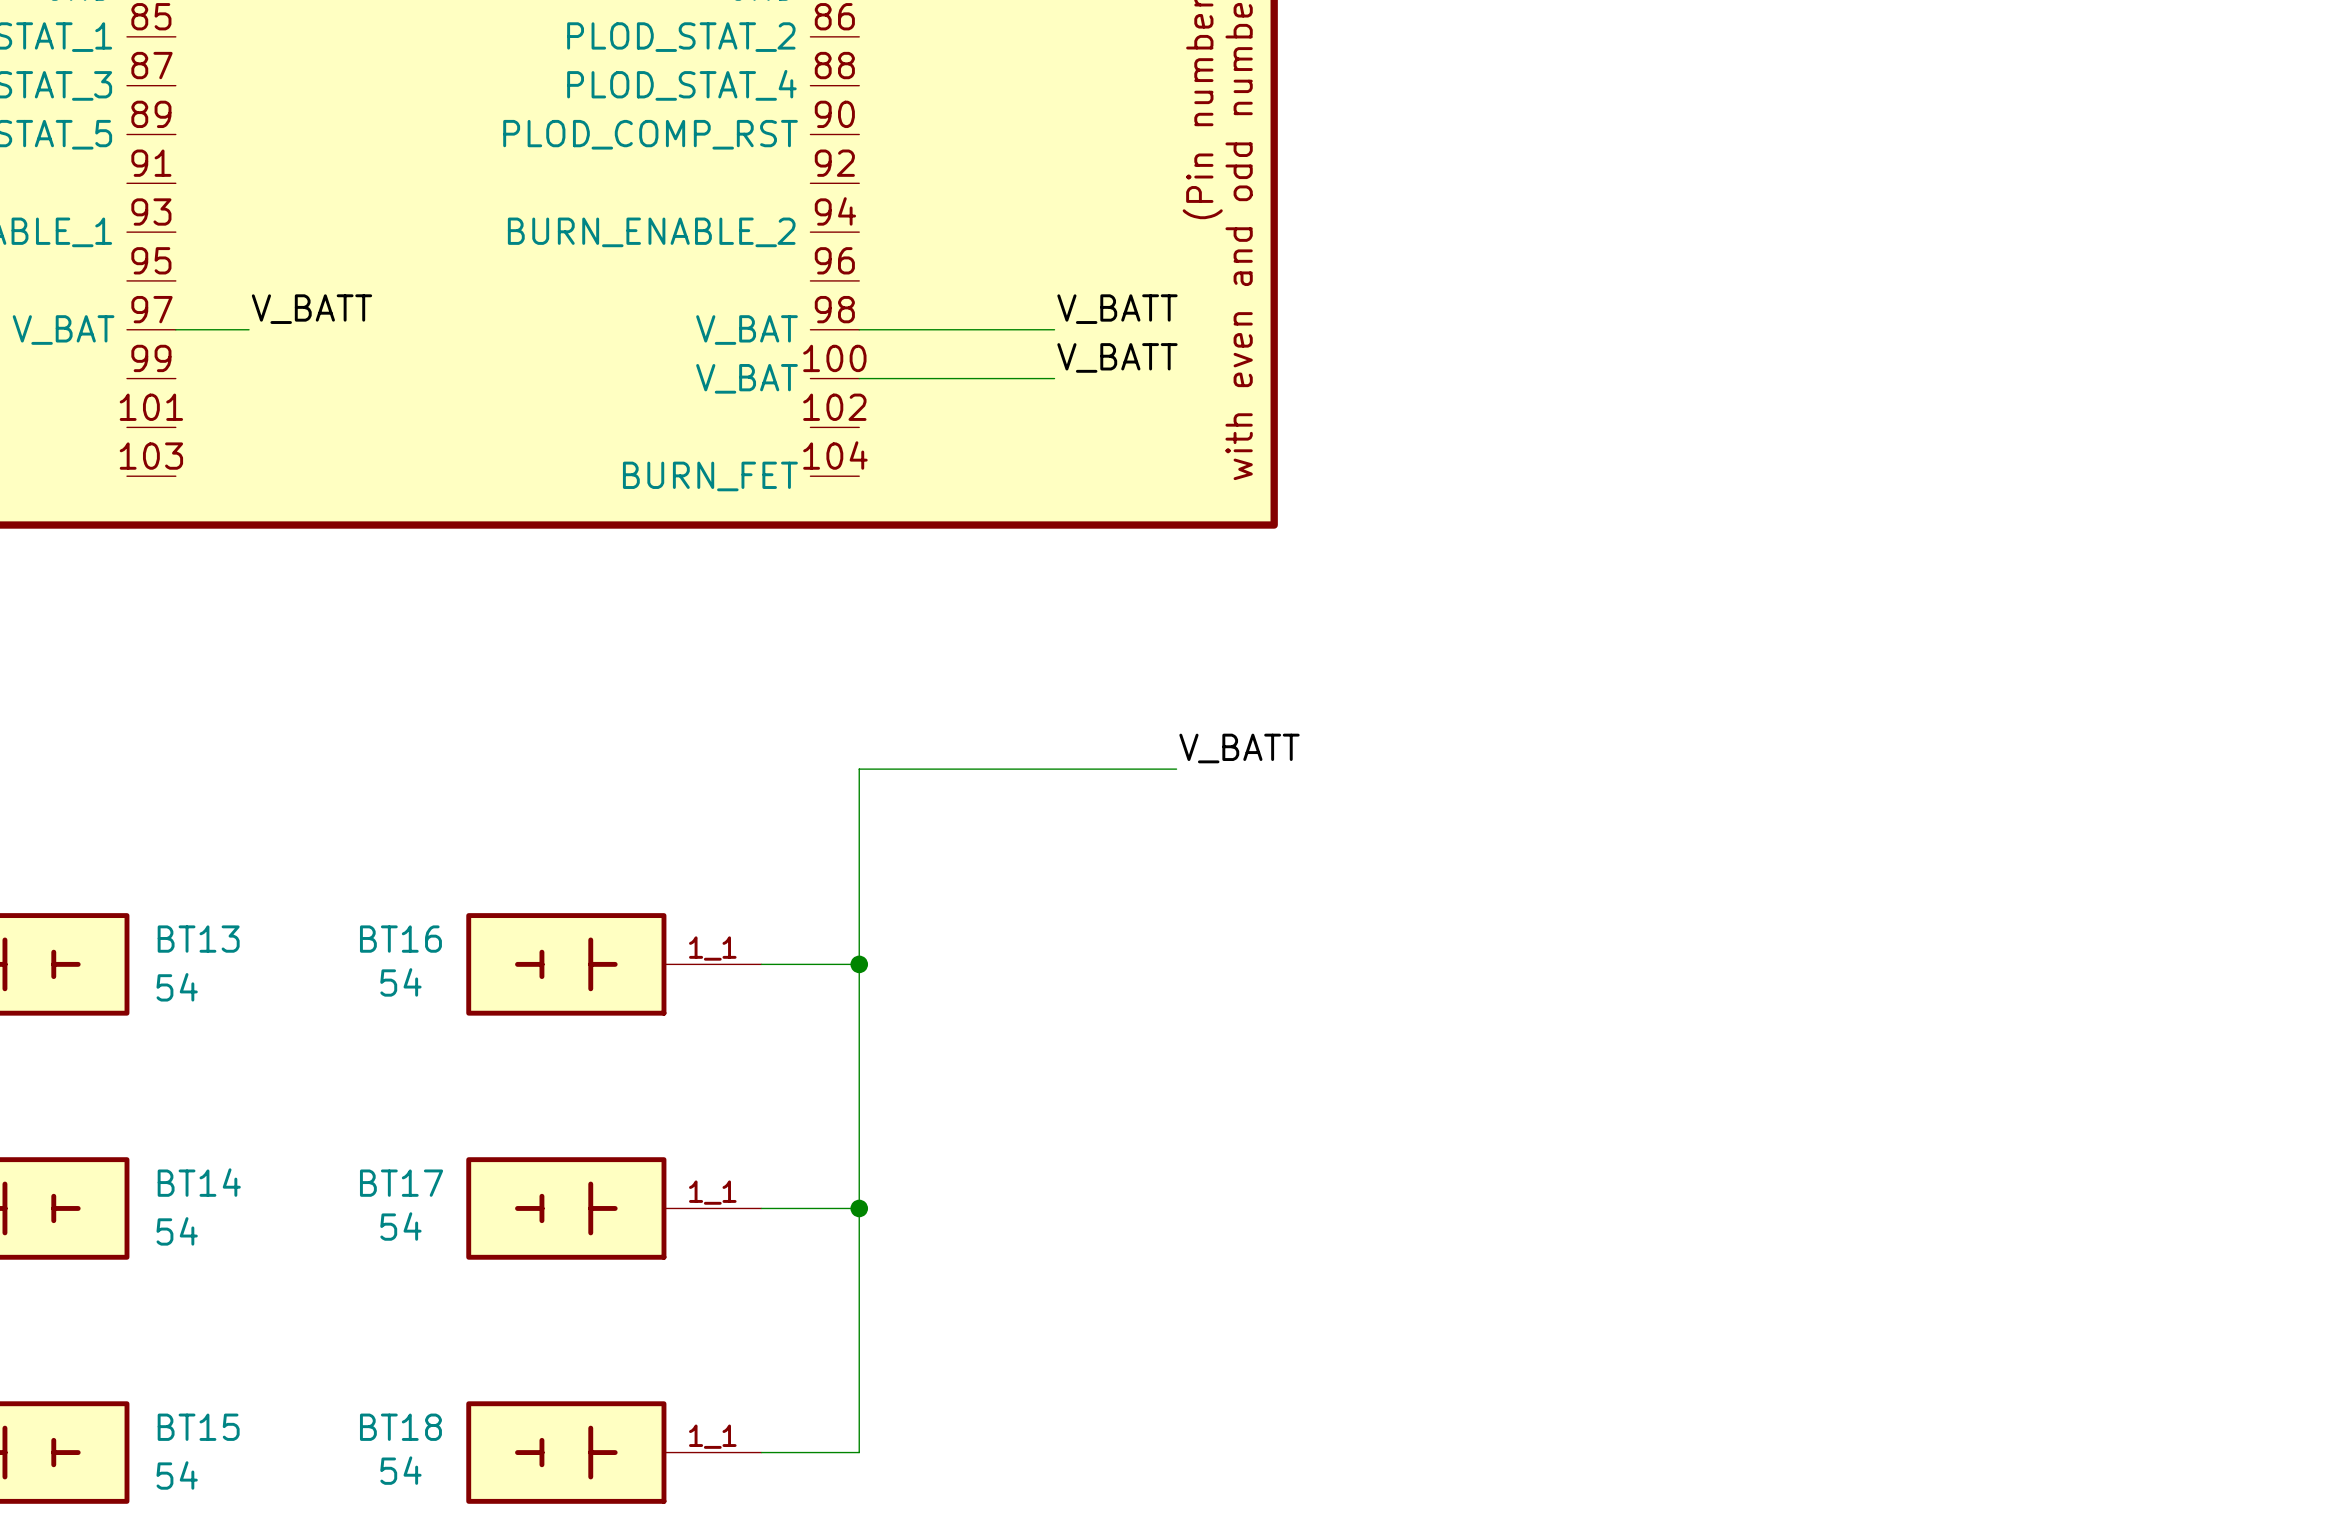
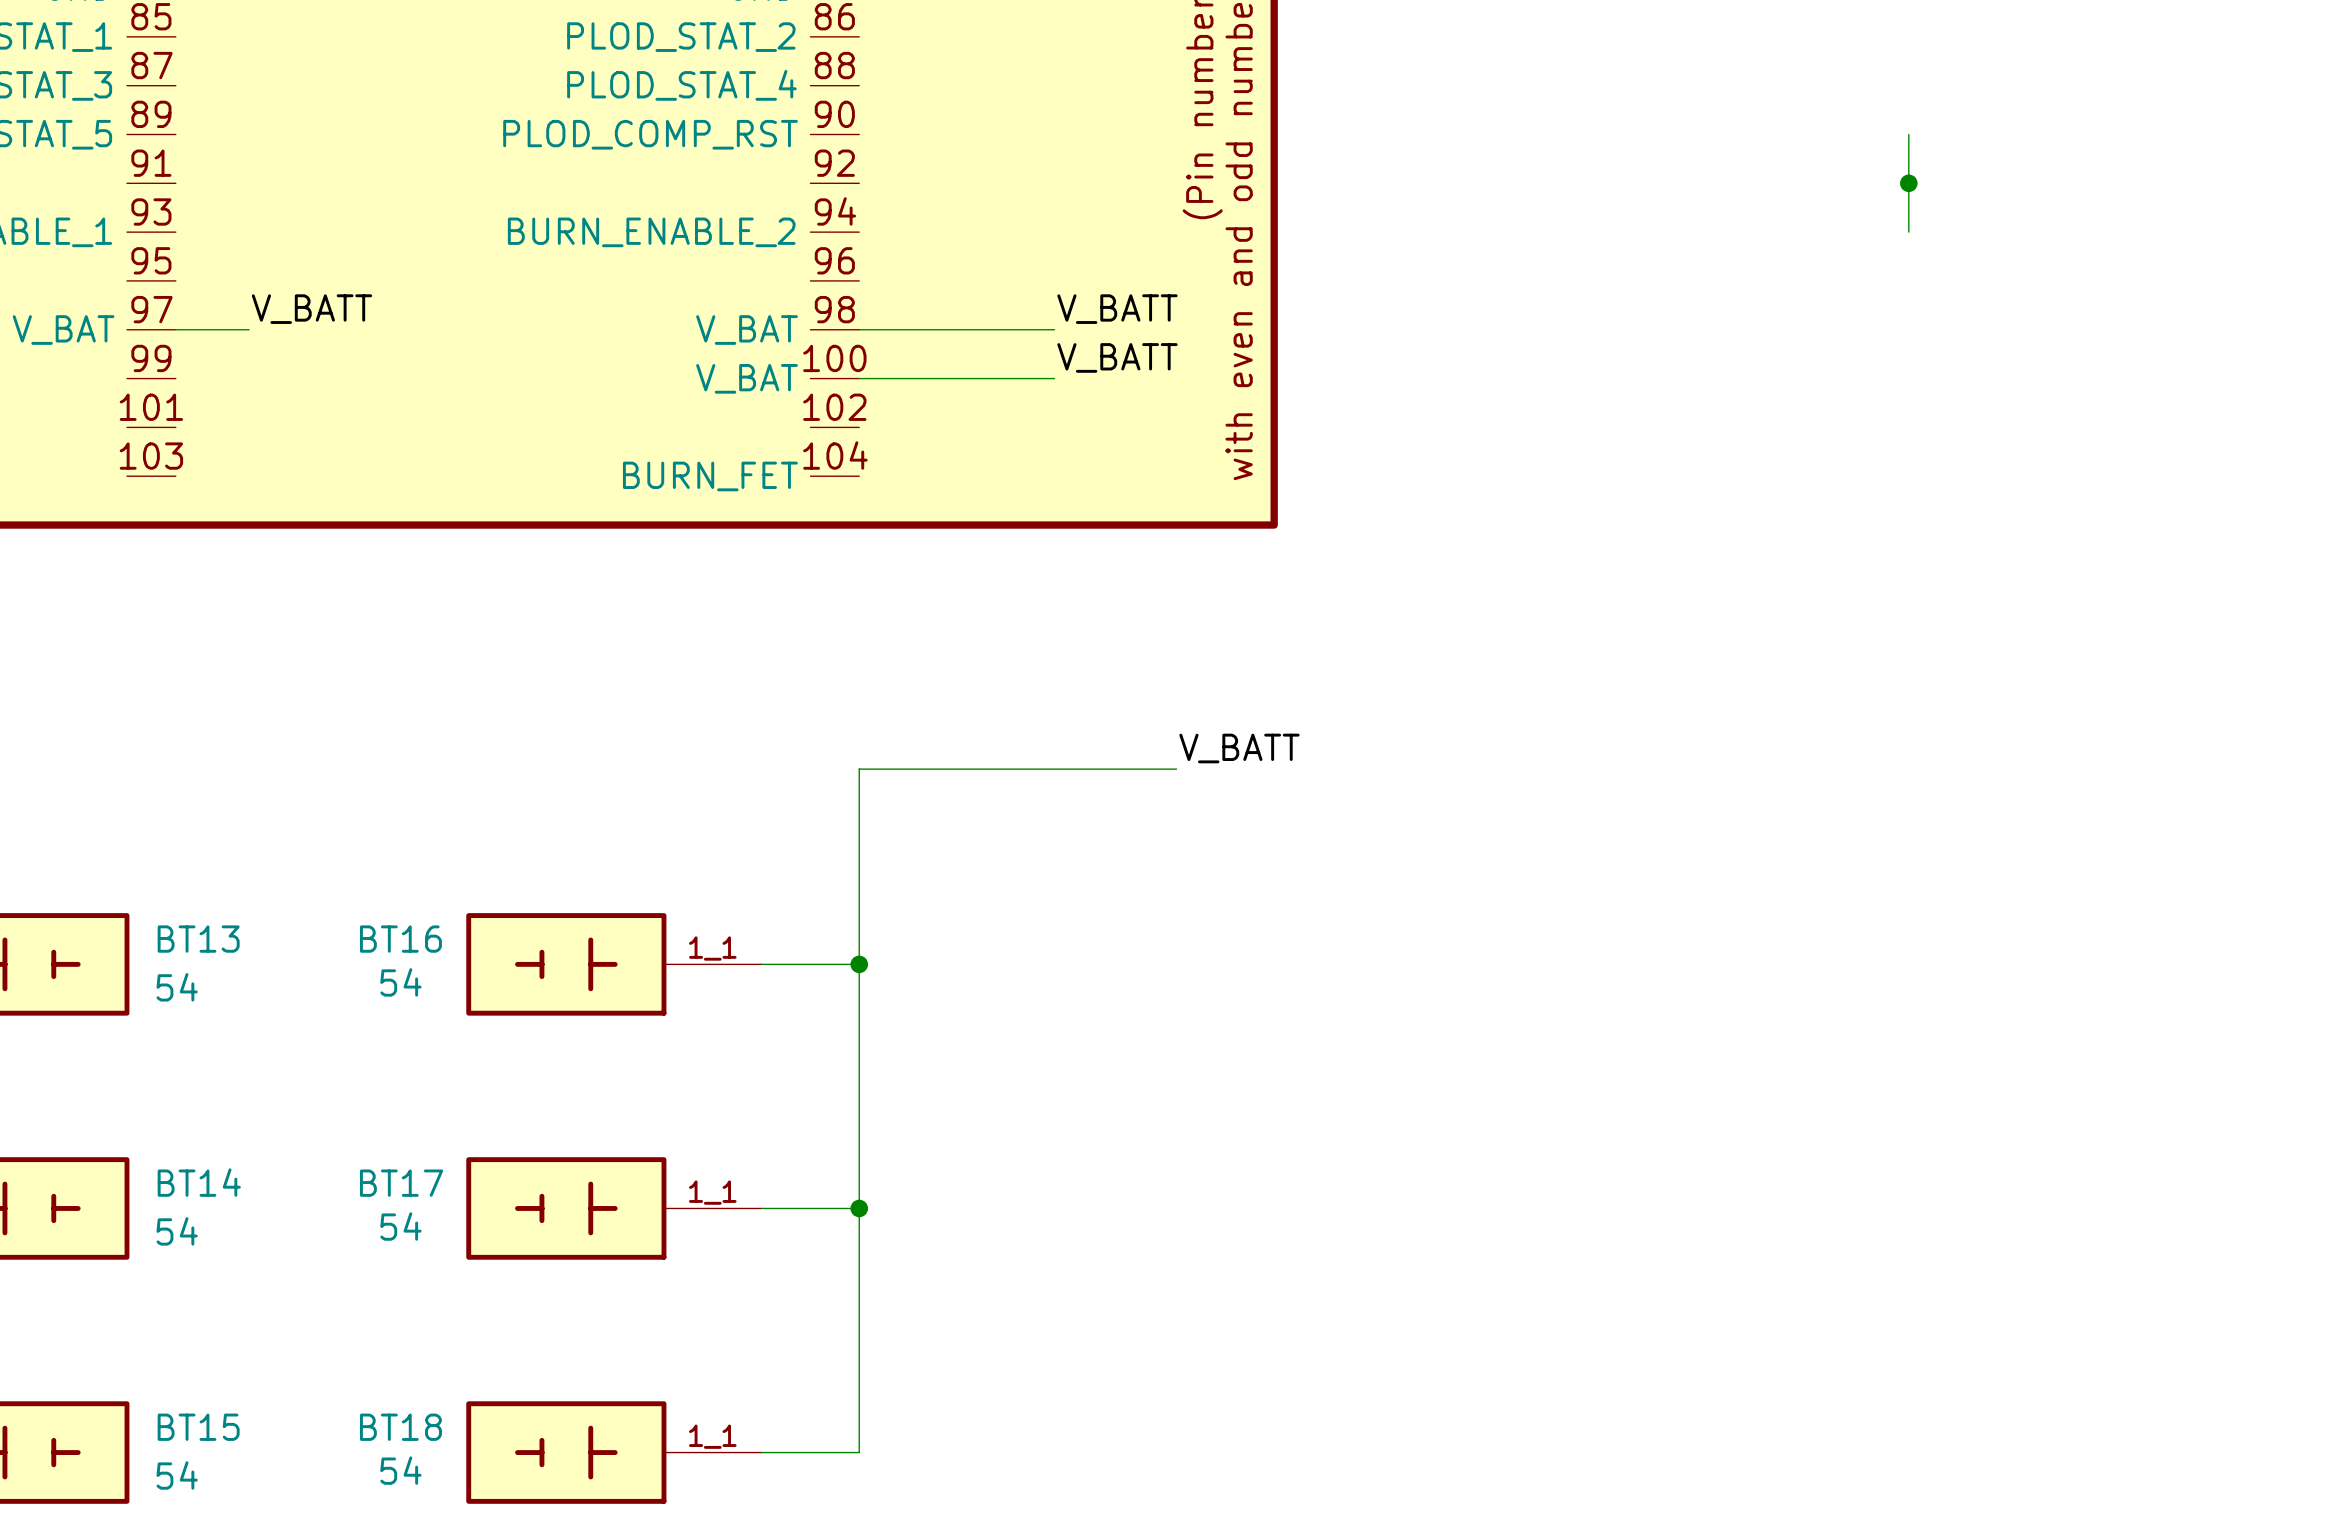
wire: none -> (1908, 134) (1908, 232)
junction: none -> (1908, 183)

